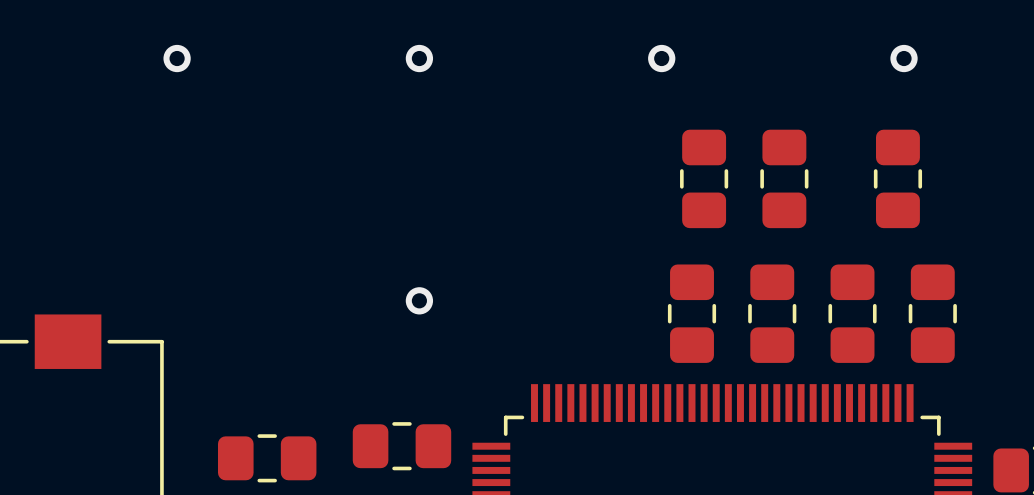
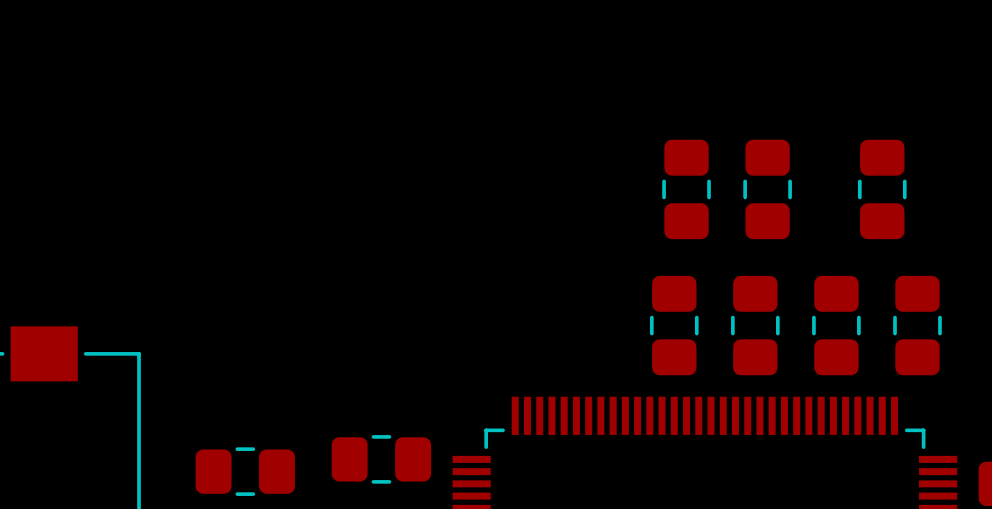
via: (177, 58) -> none
via: (419, 58) -> none
via: (661, 58) -> none
via: (904, 58) -> none
via: (419, 300) -> none

